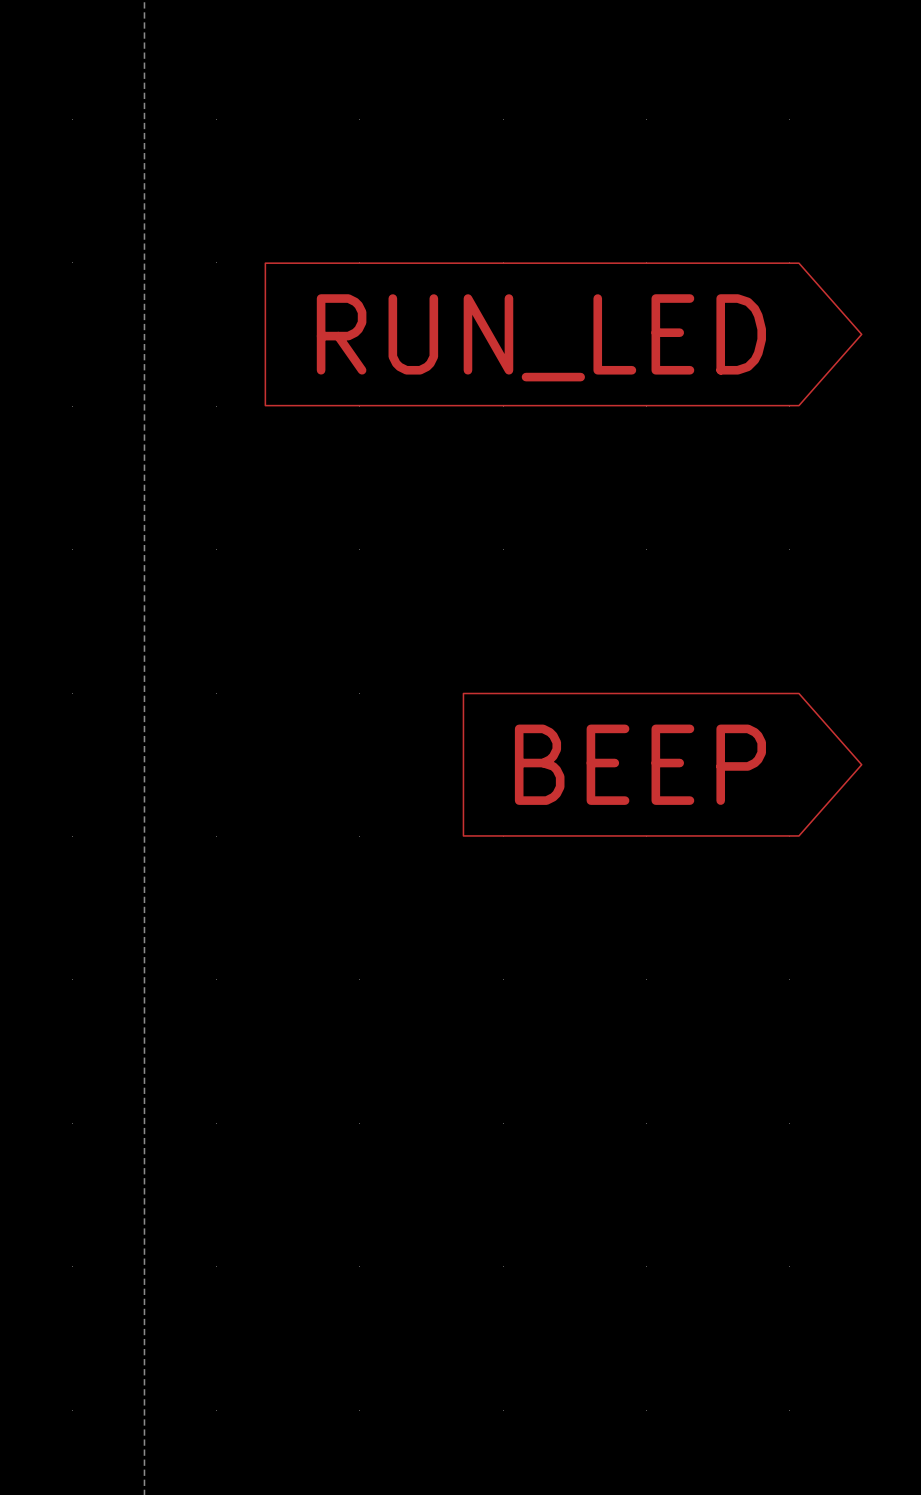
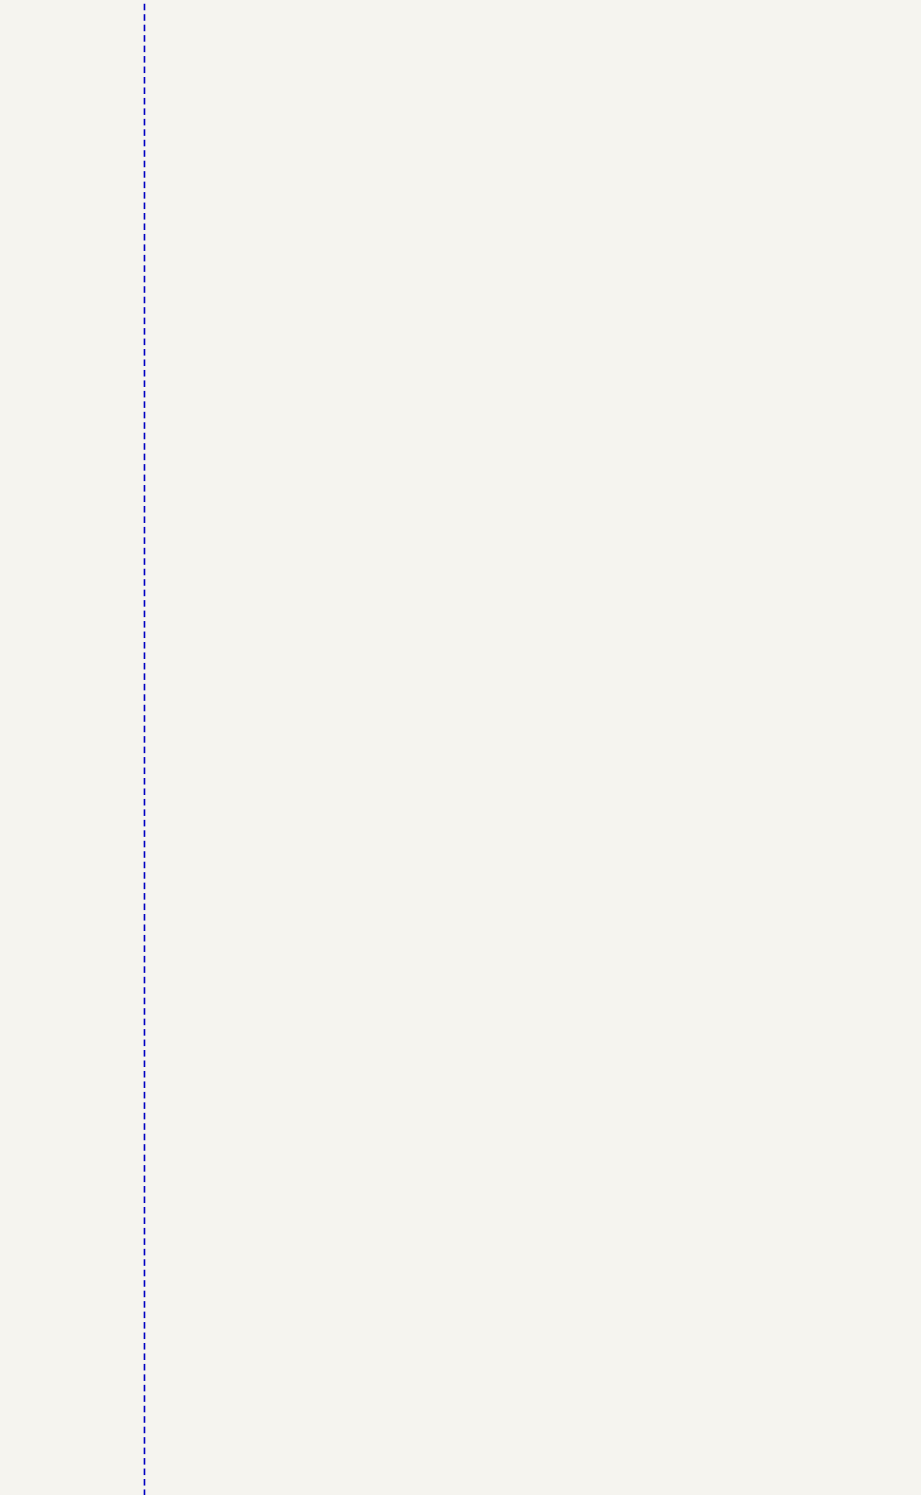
global label: RUN_LED (541, 337) -> none
global label: BEEP (640, 764) -> none

